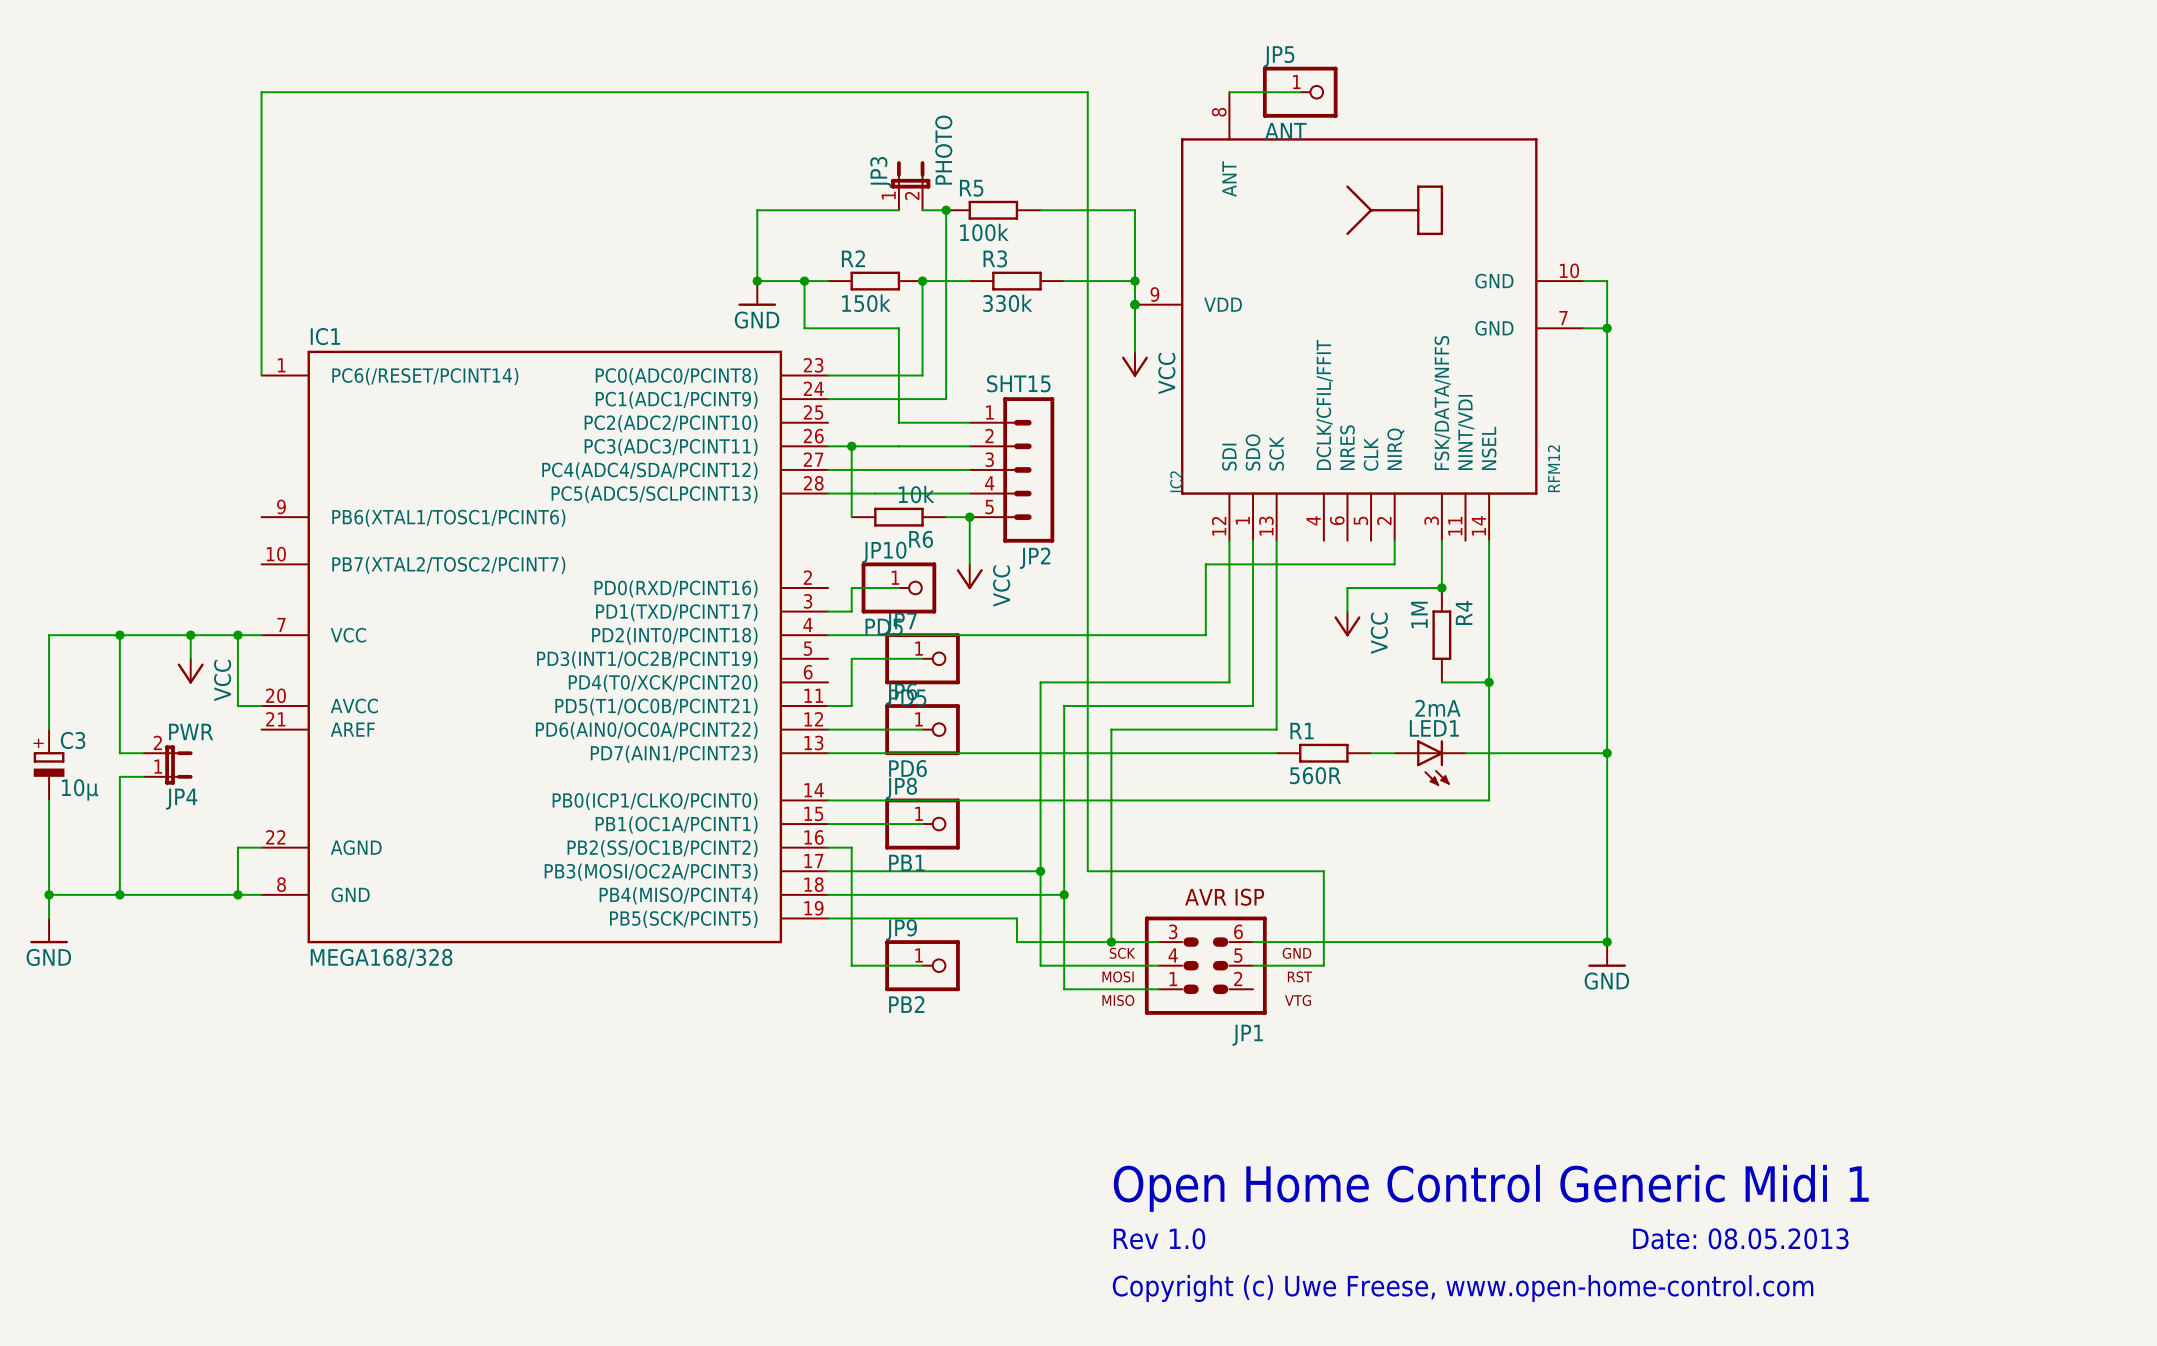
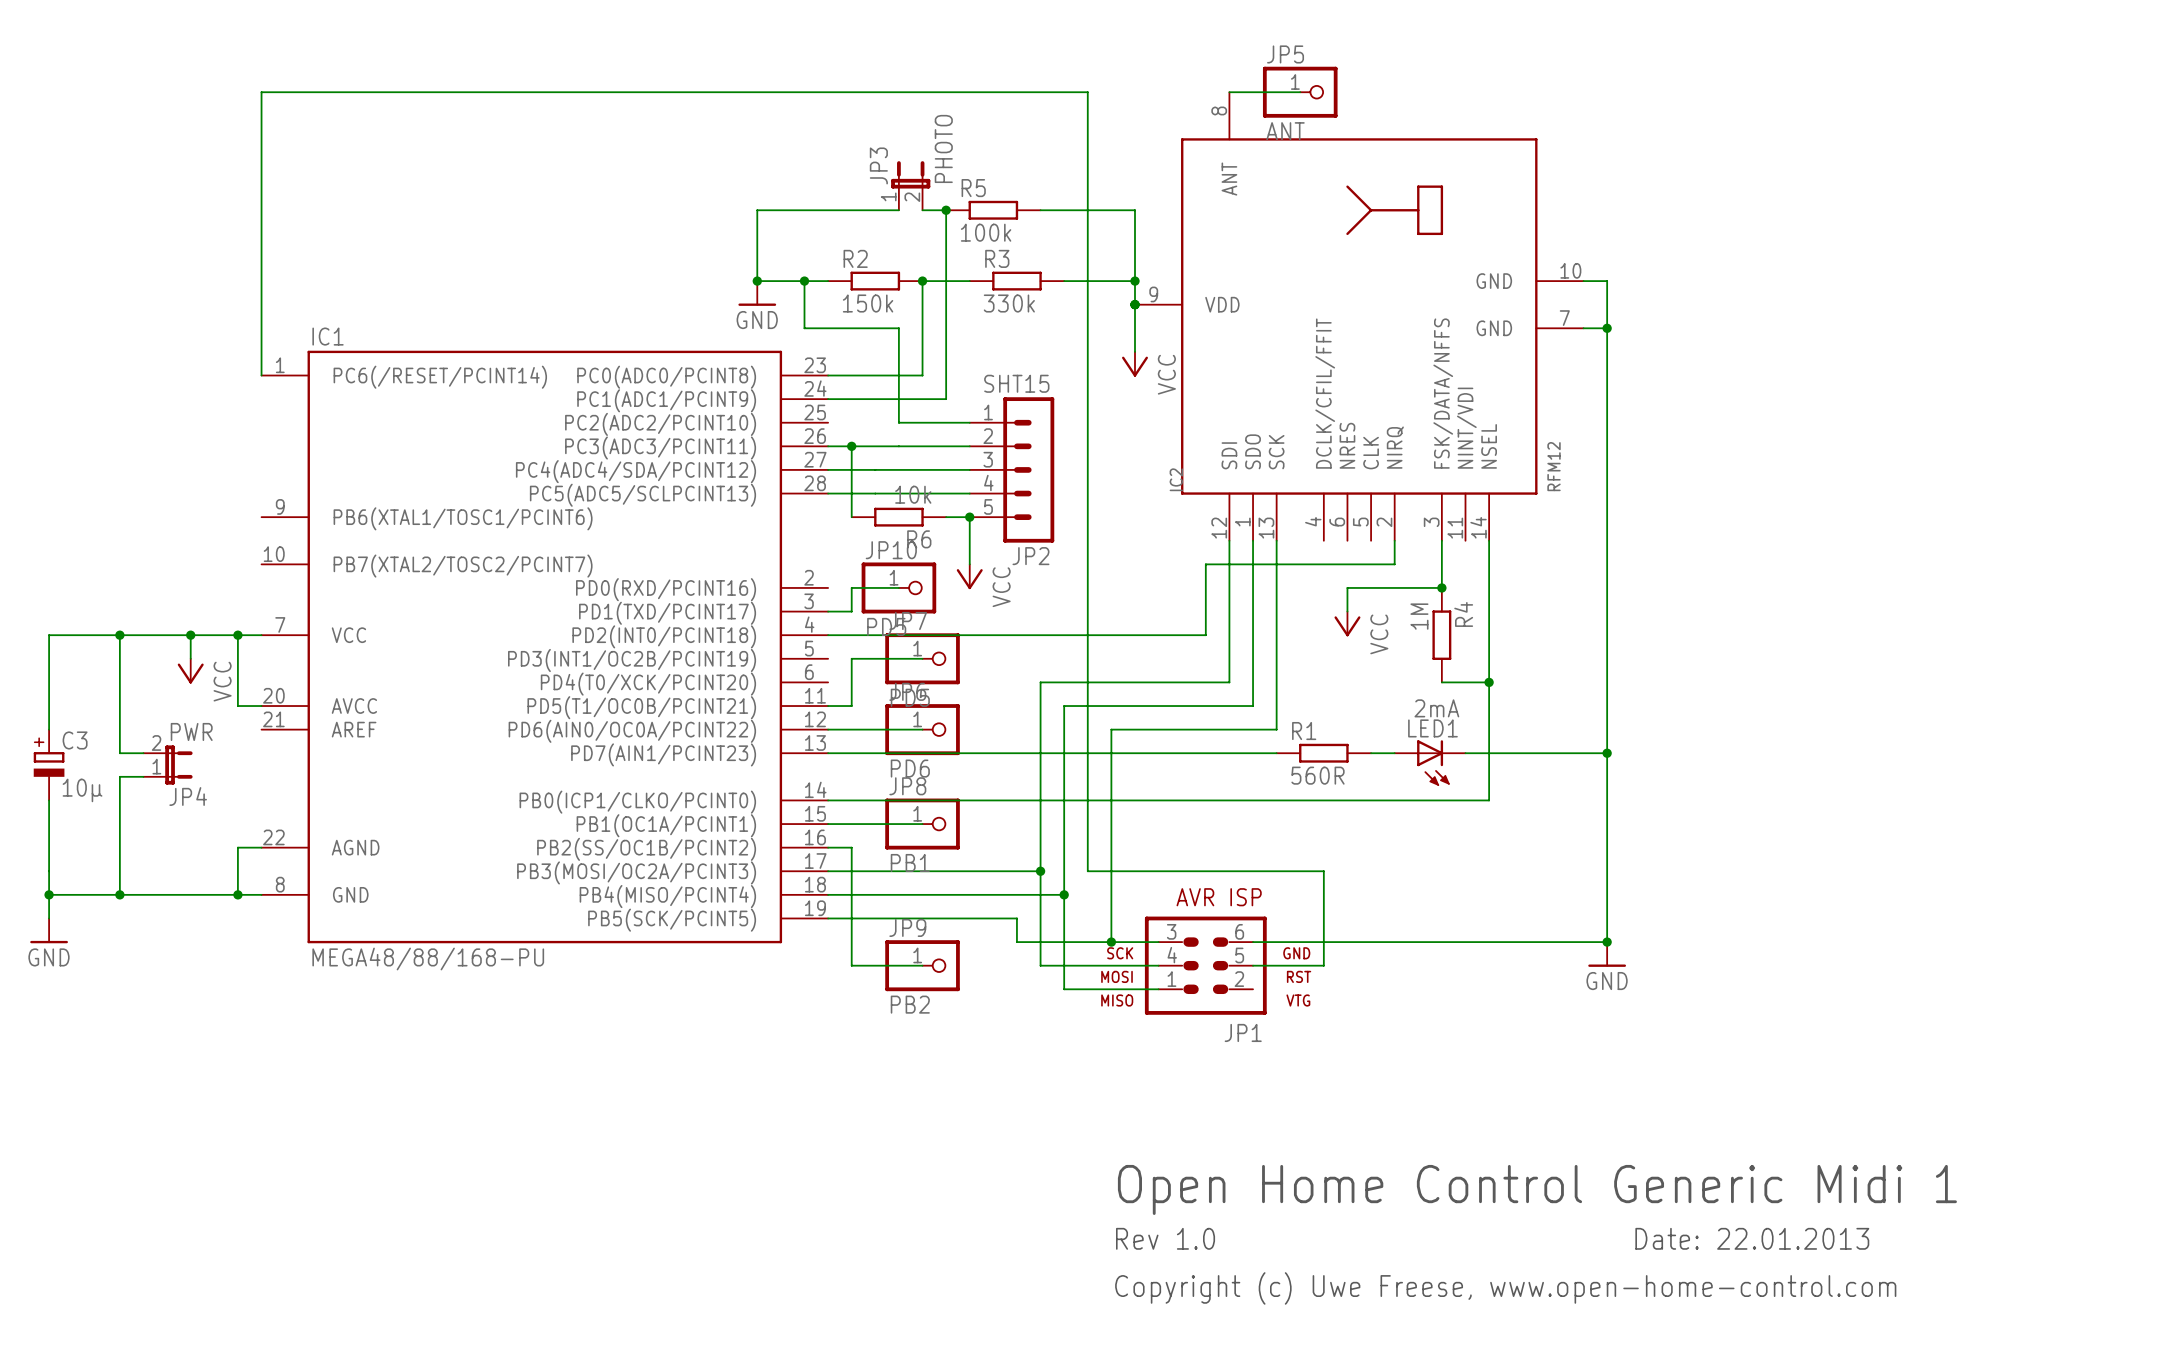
IC1 value: MEGA168/328 (381, 958) -> MEGA48/88/168-PU (428, 959)
text: Date: 08.05.2013 (1740, 1238) -> Date: 22.01.2013 (1752, 1238)

